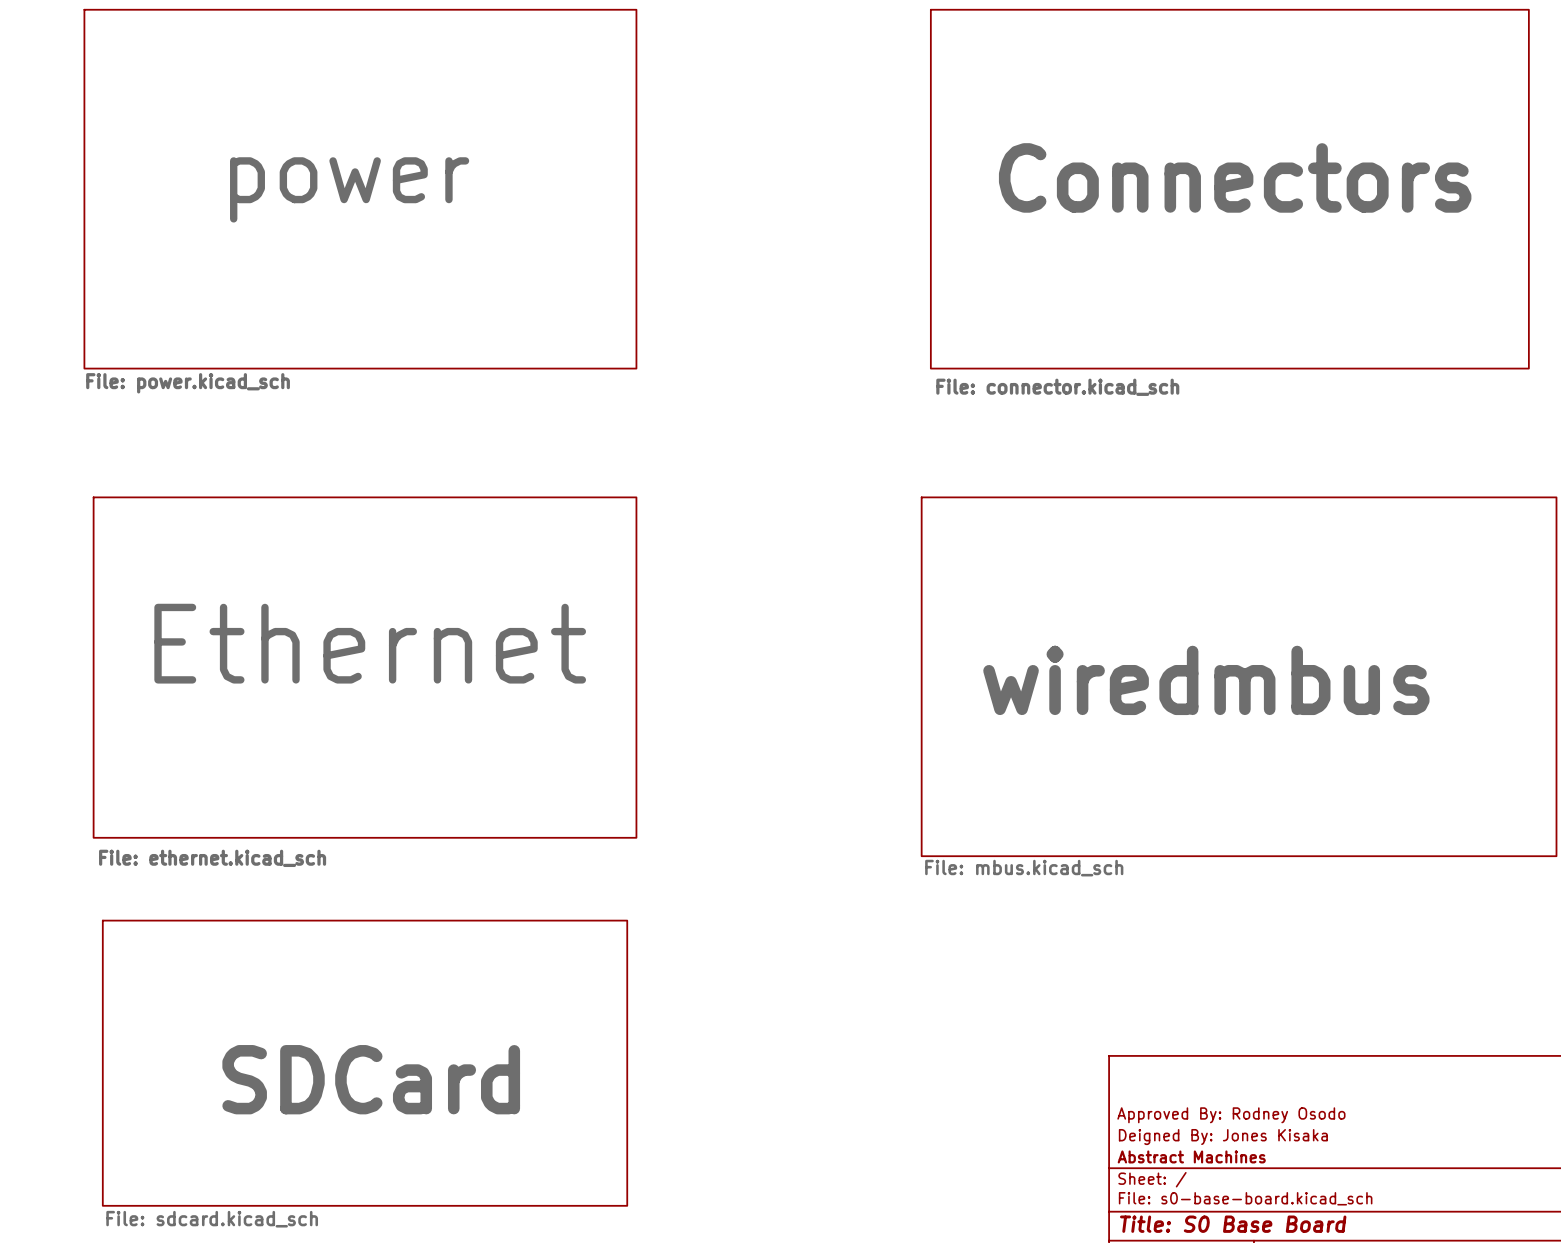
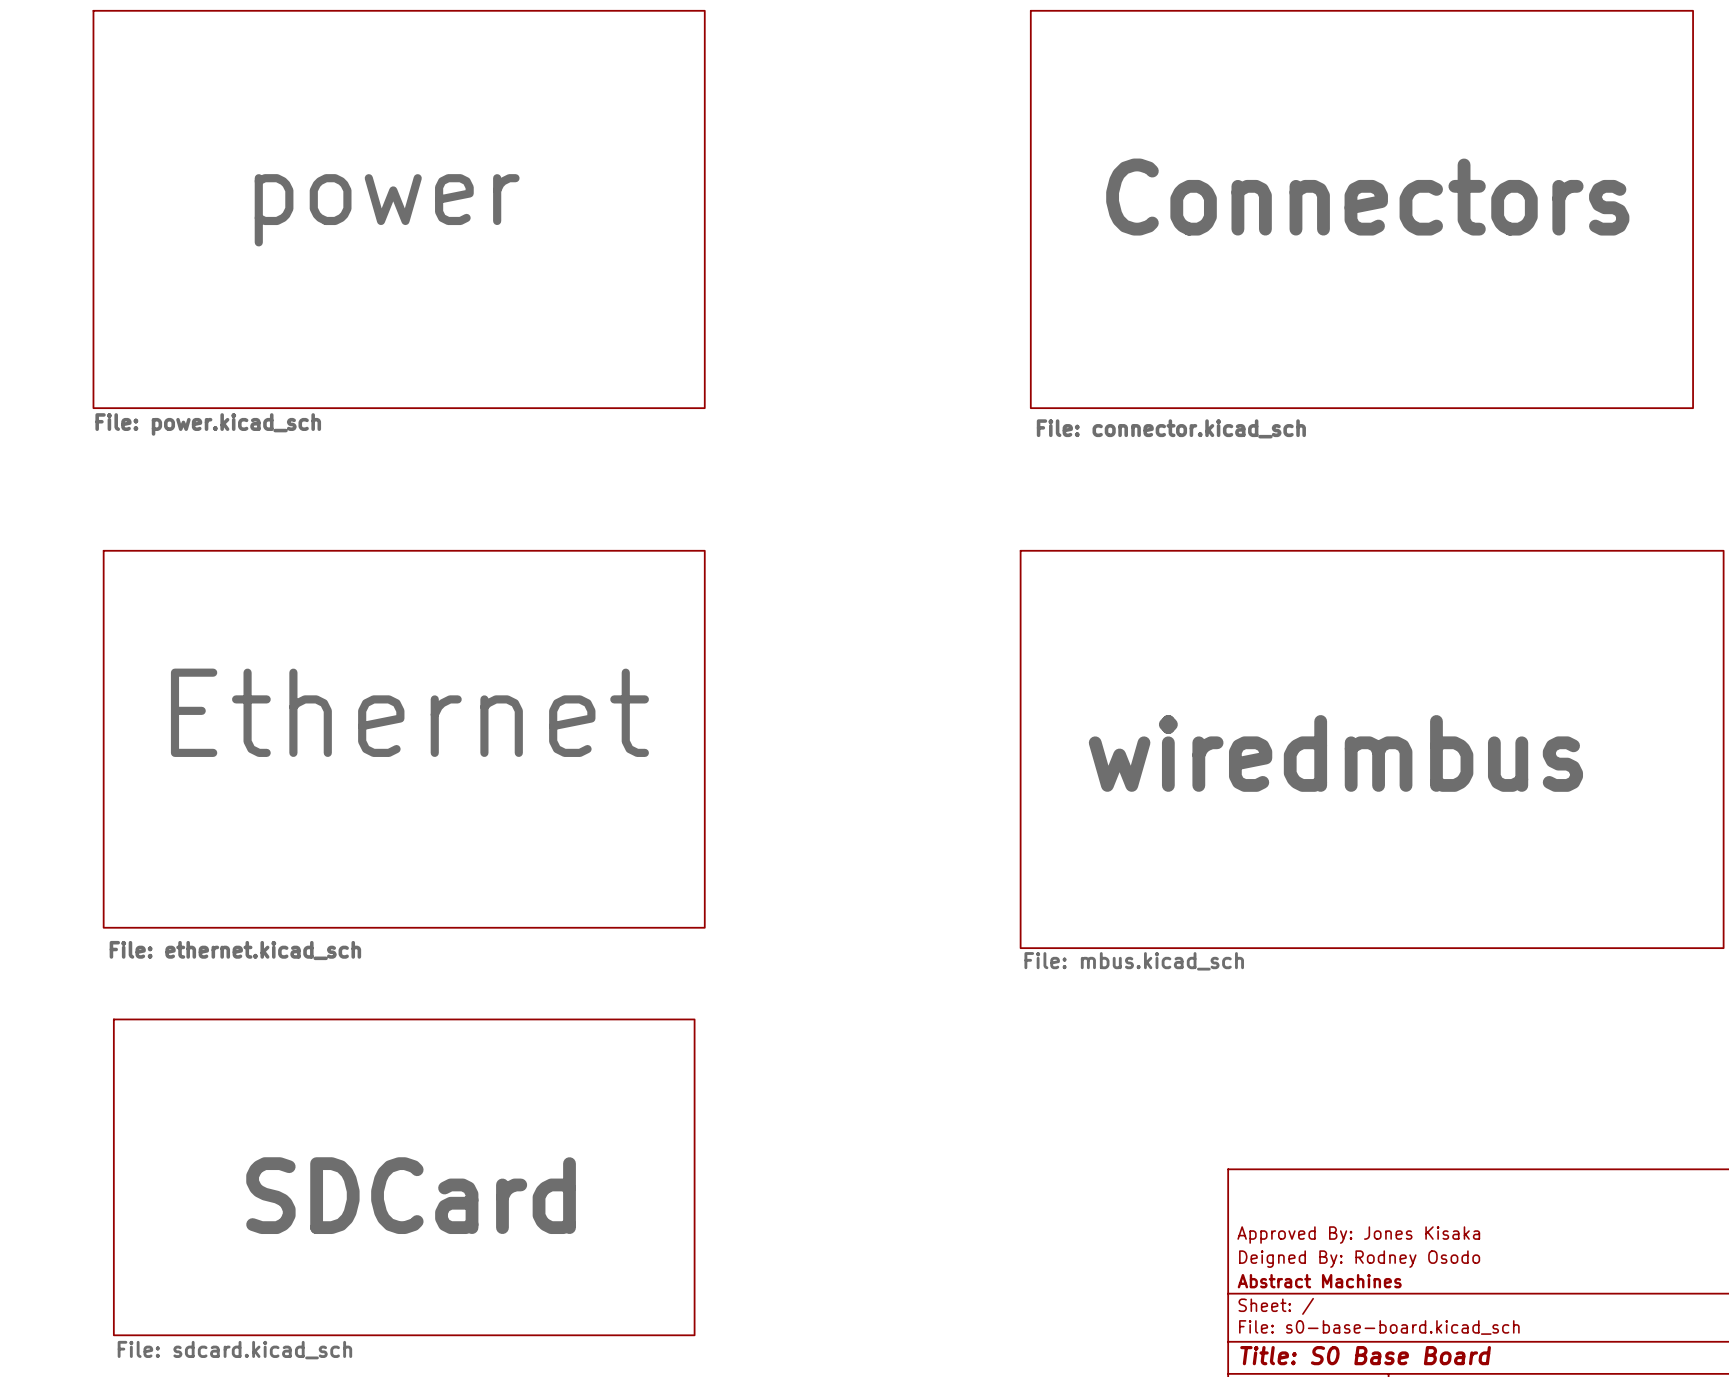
title block: Approved By: Rodney Osodo (1231, 1115) -> Approved By: Jones Kisaka (1358, 1235)
title block: Deigned By: Jones Kisaka (1223, 1137) -> Deigned By: Rodney Osodo (1359, 1259)

